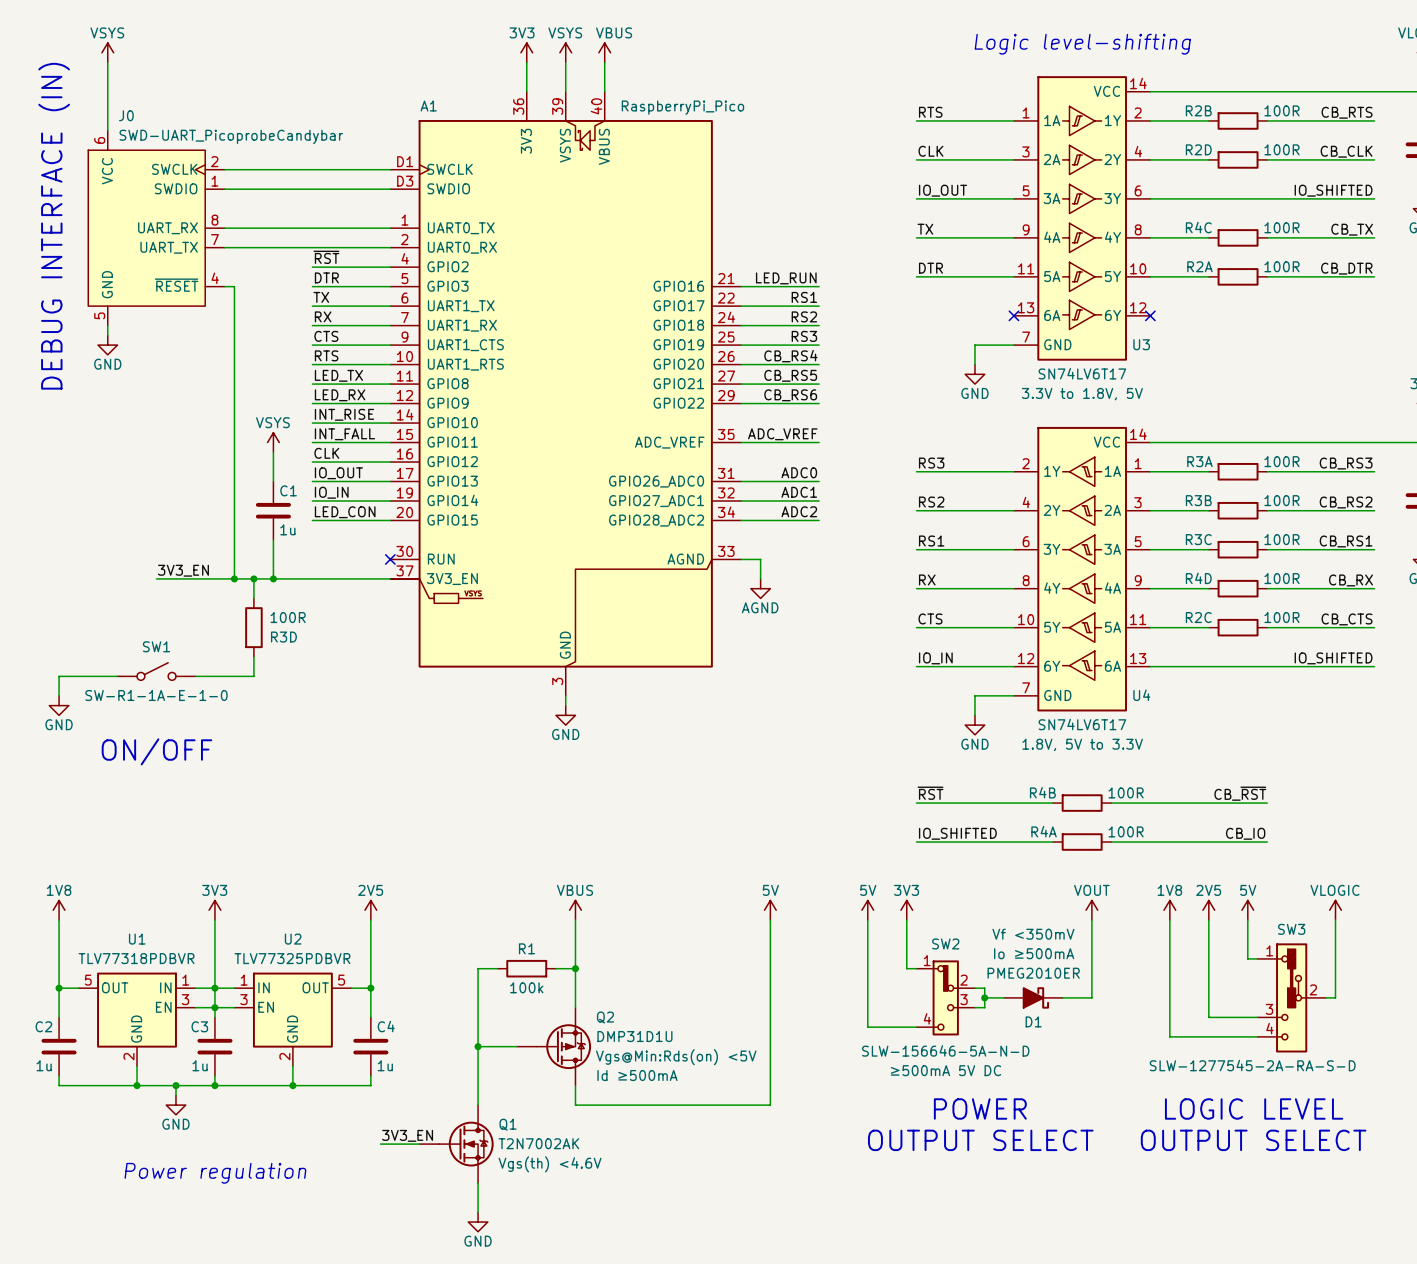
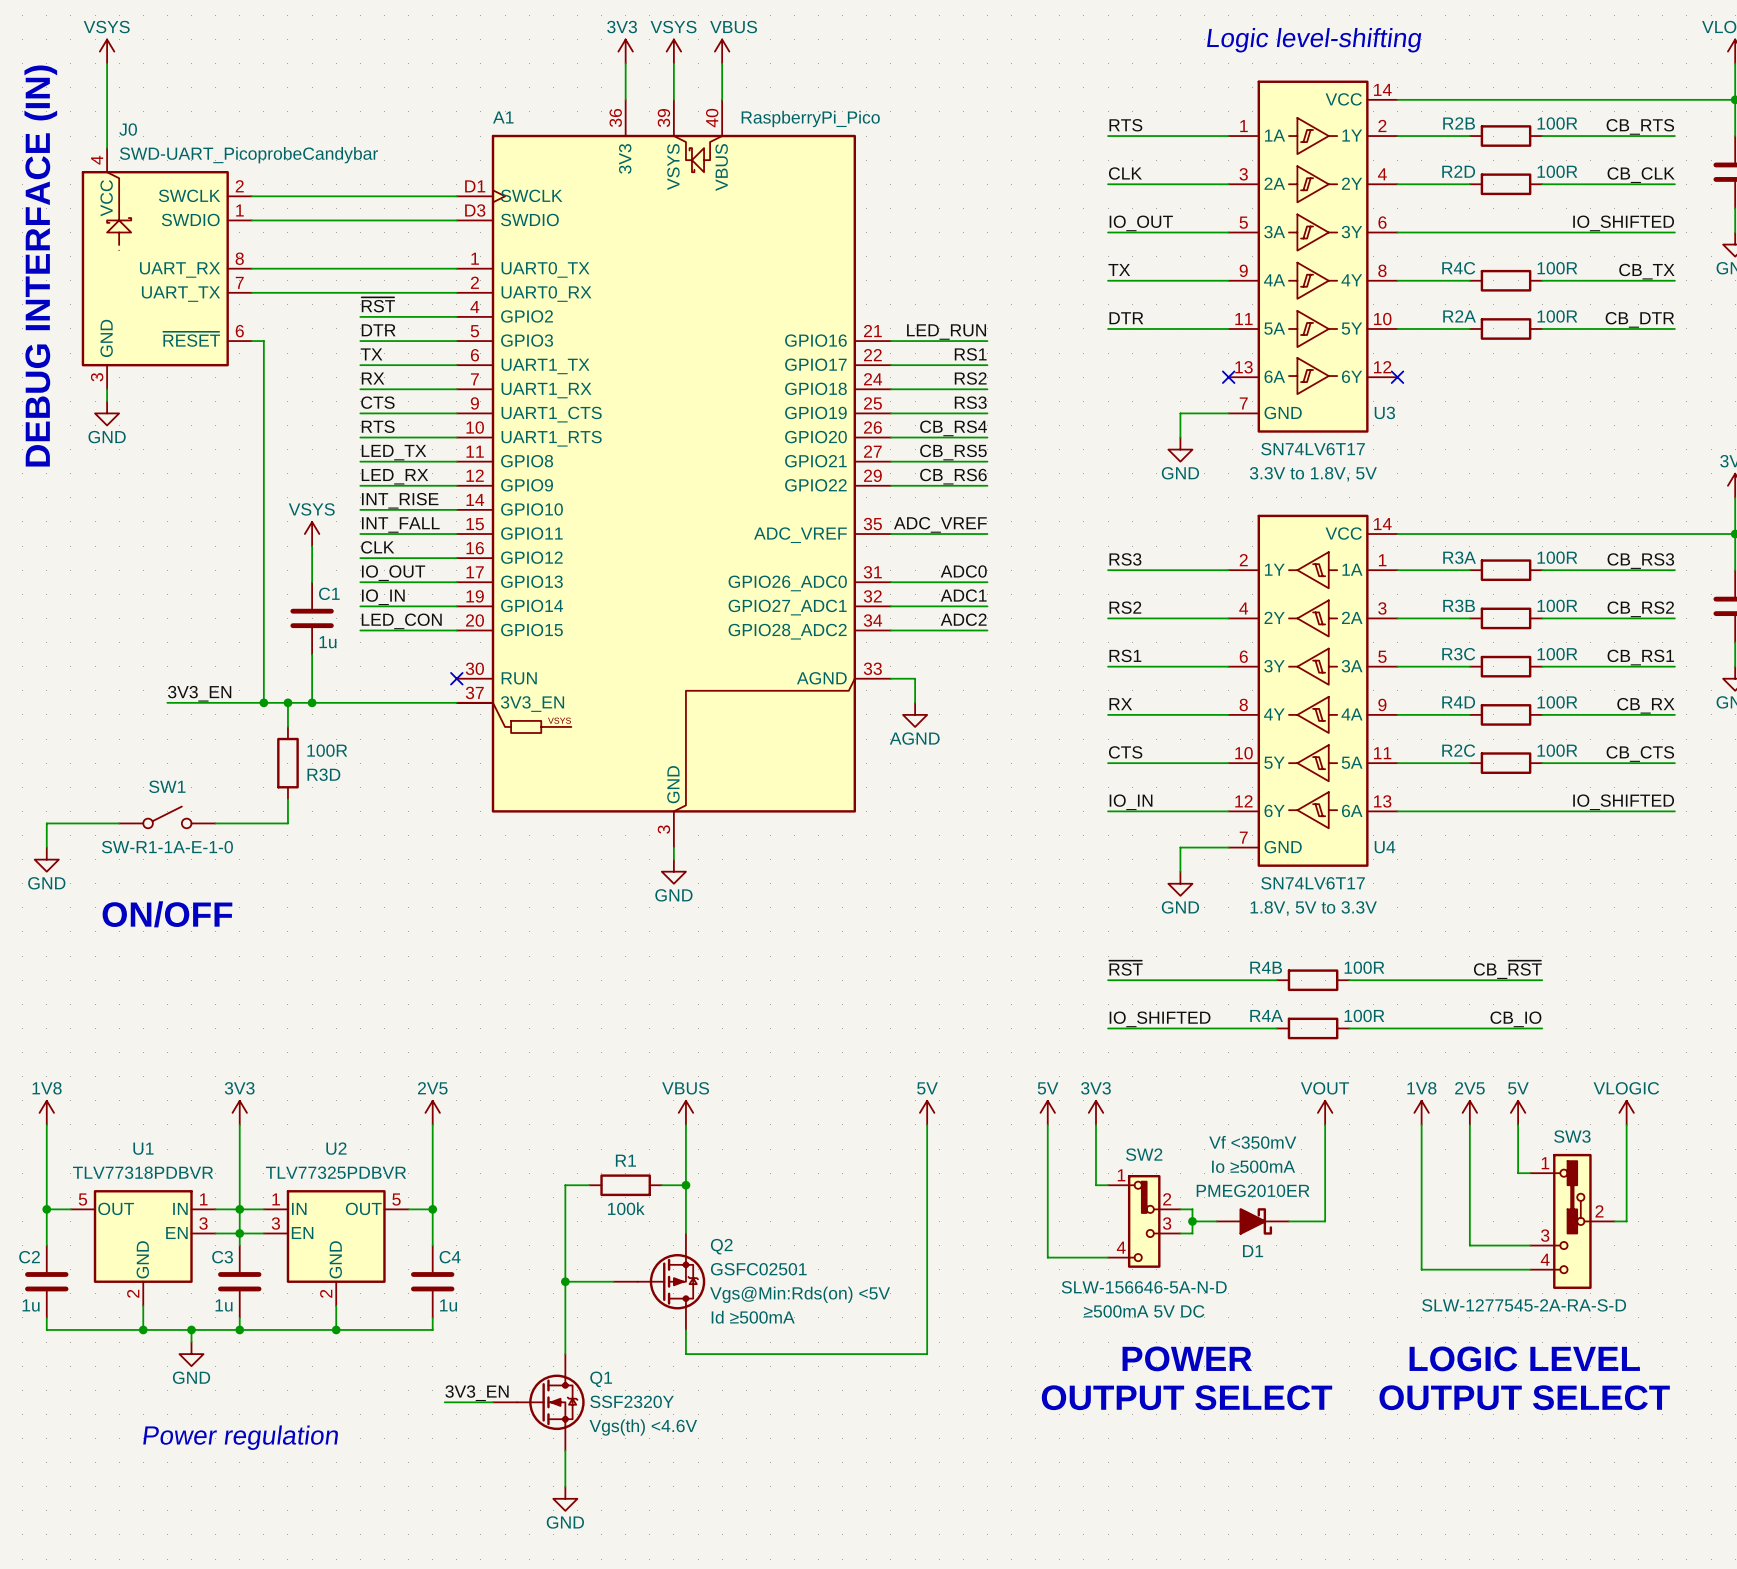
J0 symbol: [88, 130, 225, 326] -> [81, 148, 252, 390]
Q2 value: DMP31D1U (634, 1036) -> GSFC02501 (758, 1269)
Q1 value: T2N7002AK (538, 1143) -> SSF2320Y (632, 1401)

